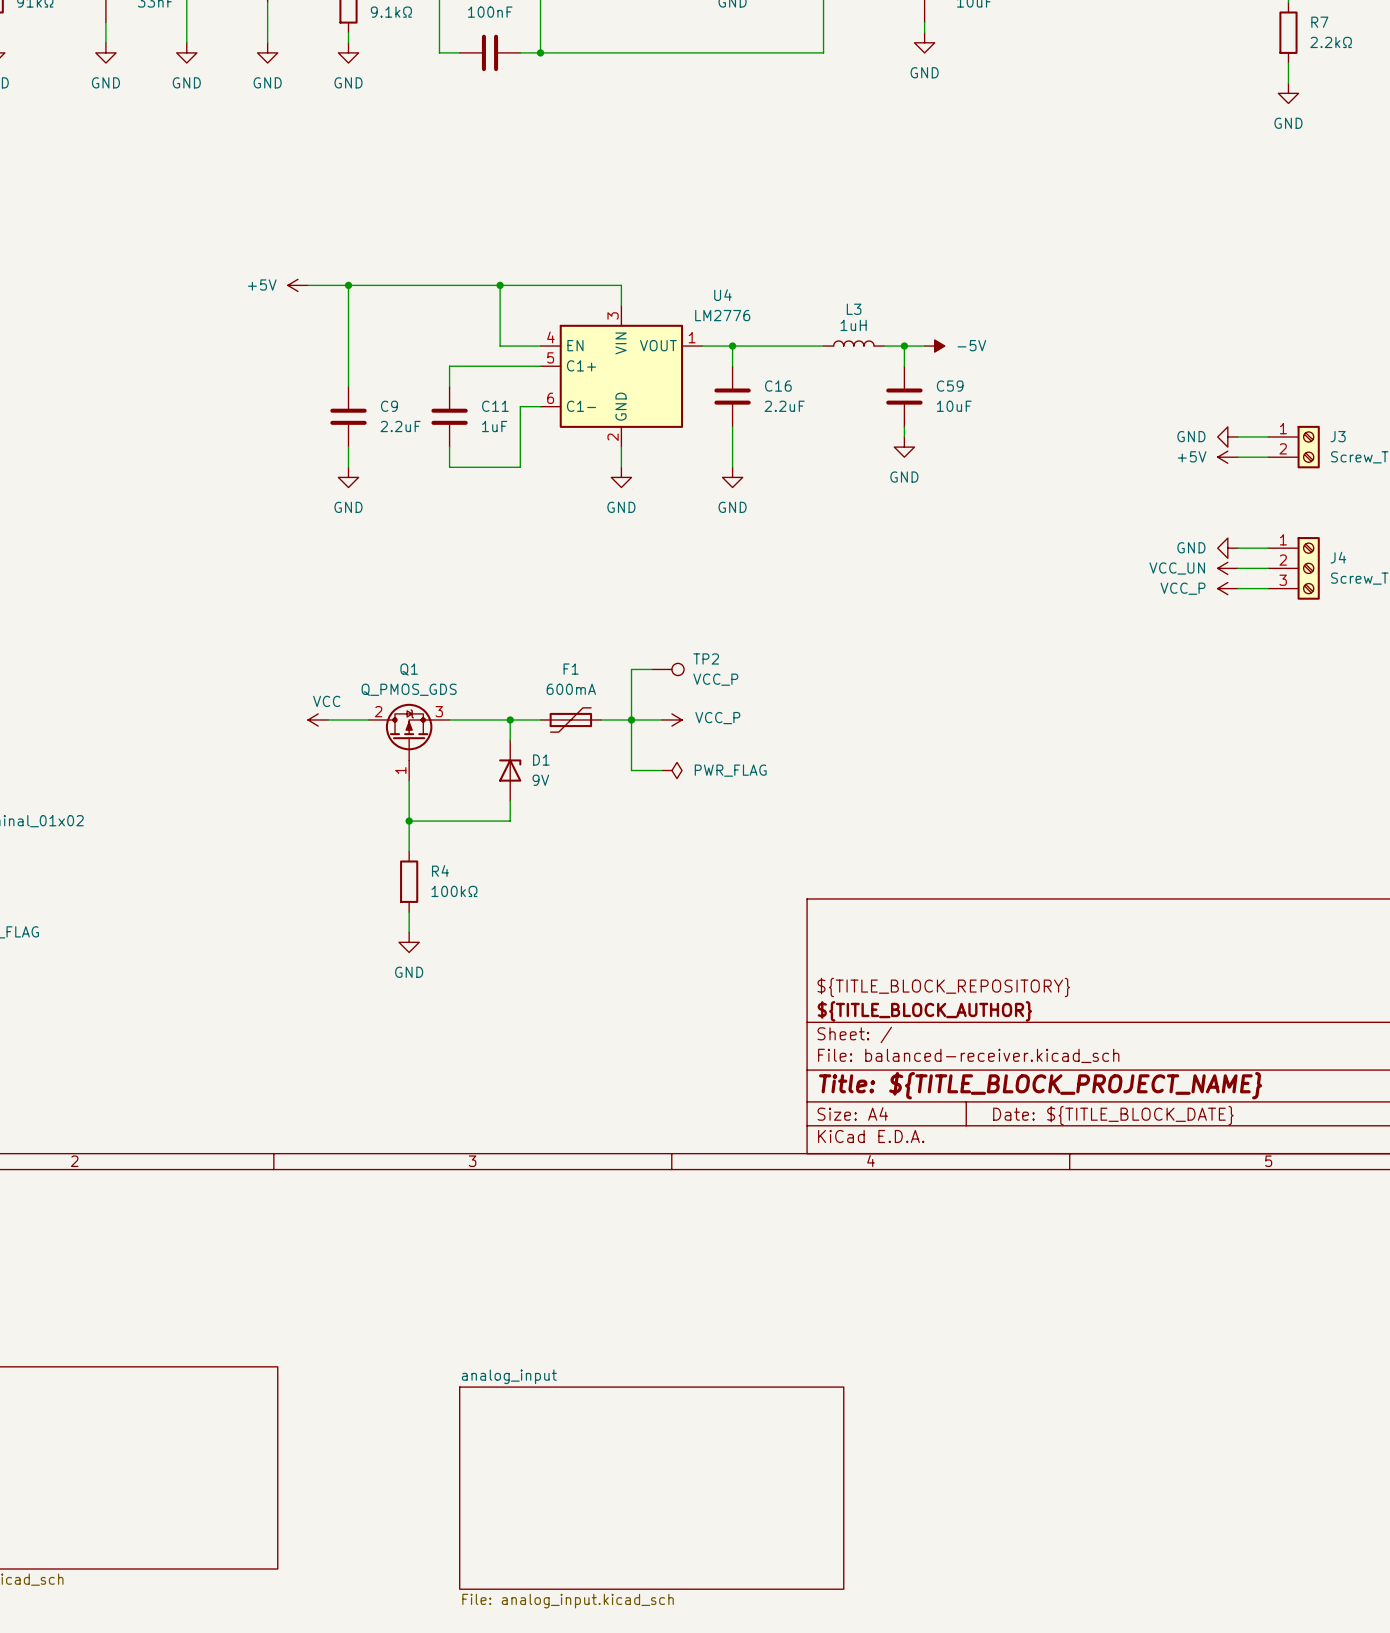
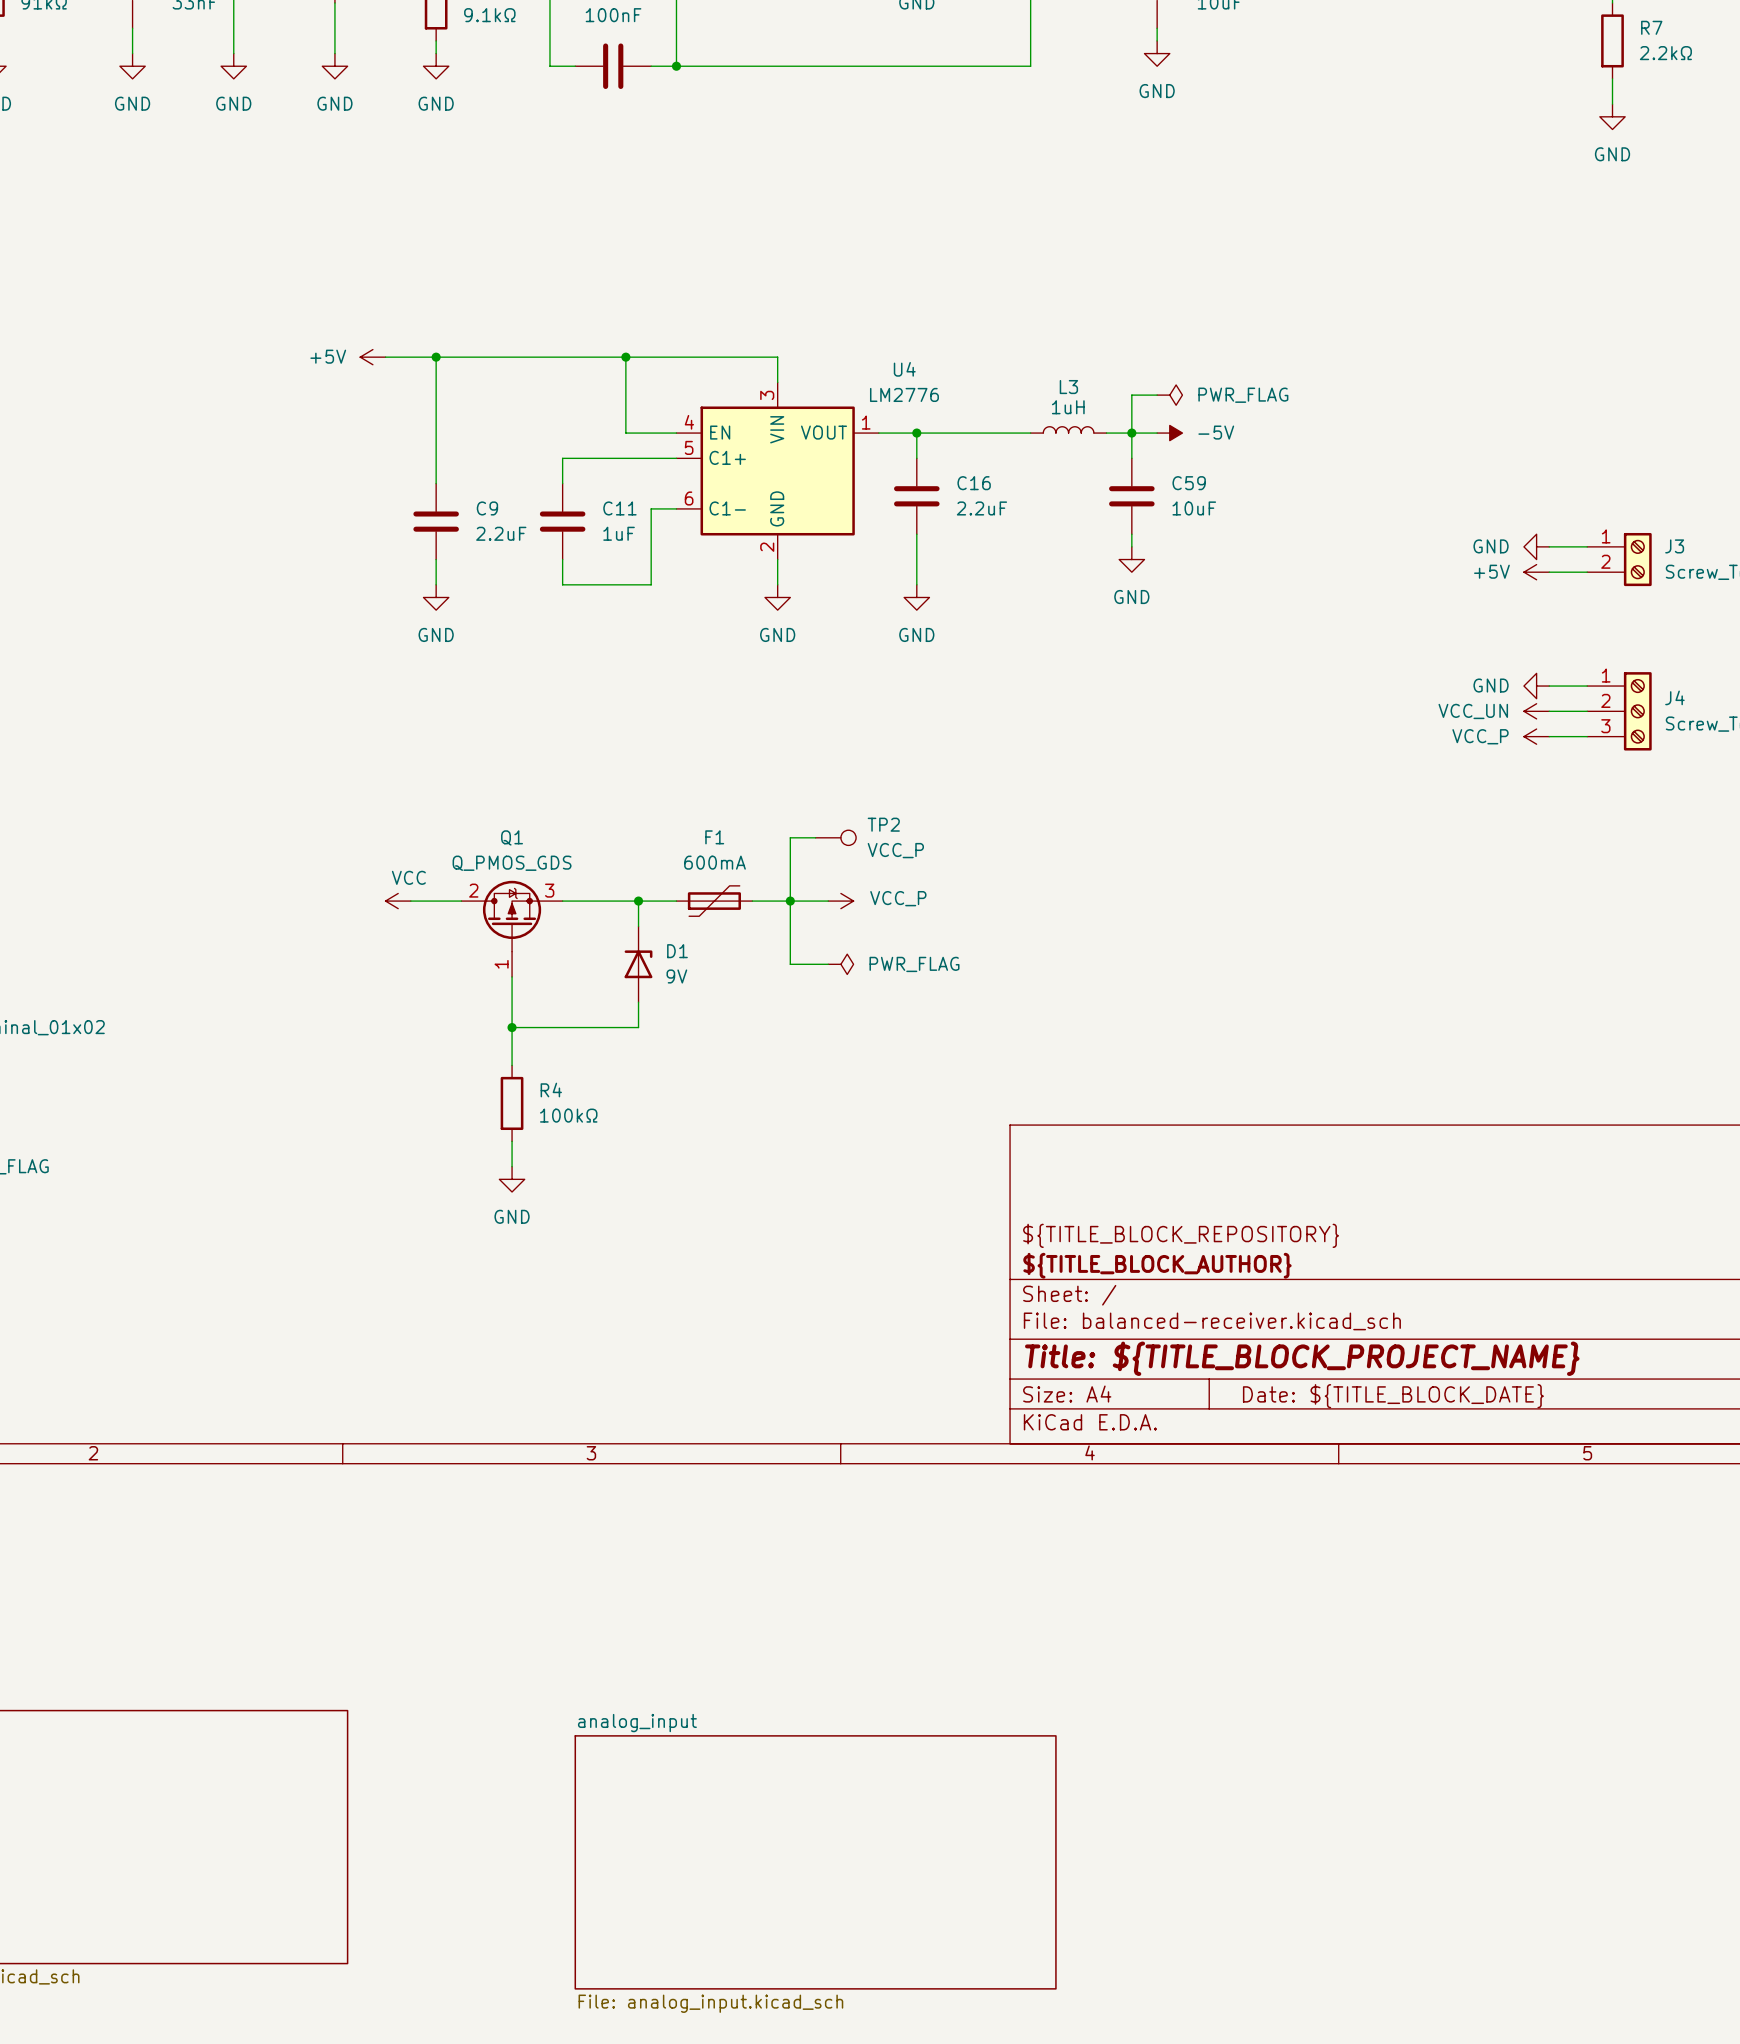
wire: none -> (1157, 395) (1131, 395) (1131, 433)
power symbol: none -> PWR_FLAG (1169, 395)

